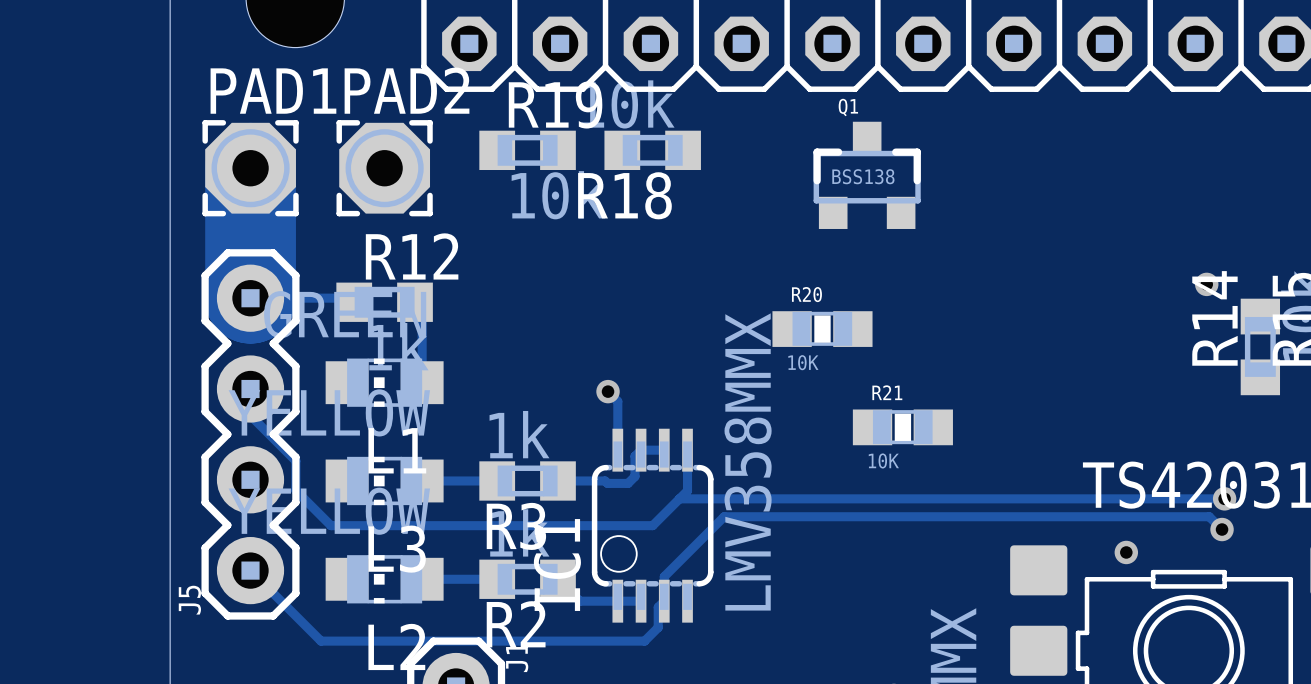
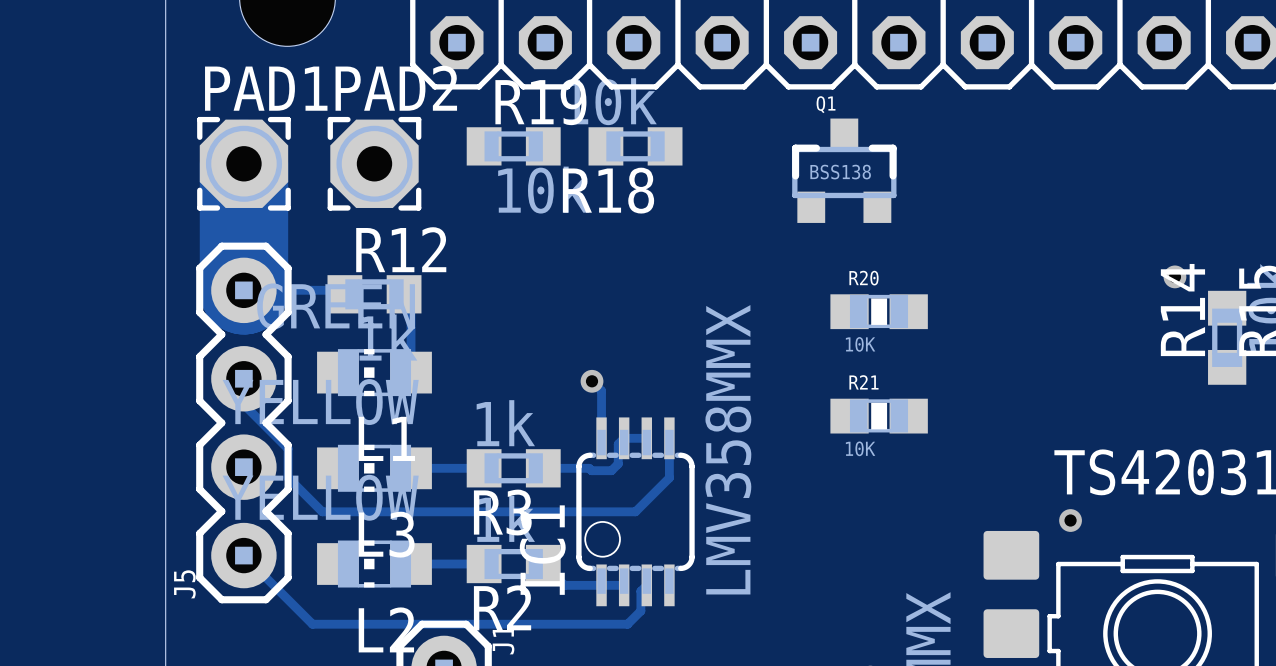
R20 position: (822, 329) -> (879, 311)
track: (679, 498) (1224, 498) -> none
via: (1224, 498) -> none
track: (1222, 529) (1209, 516) (724, 516) (664, 576) (664, 601) -> none
via: (1222, 529) -> none
via position: (1126, 552) -> (1070, 520)

